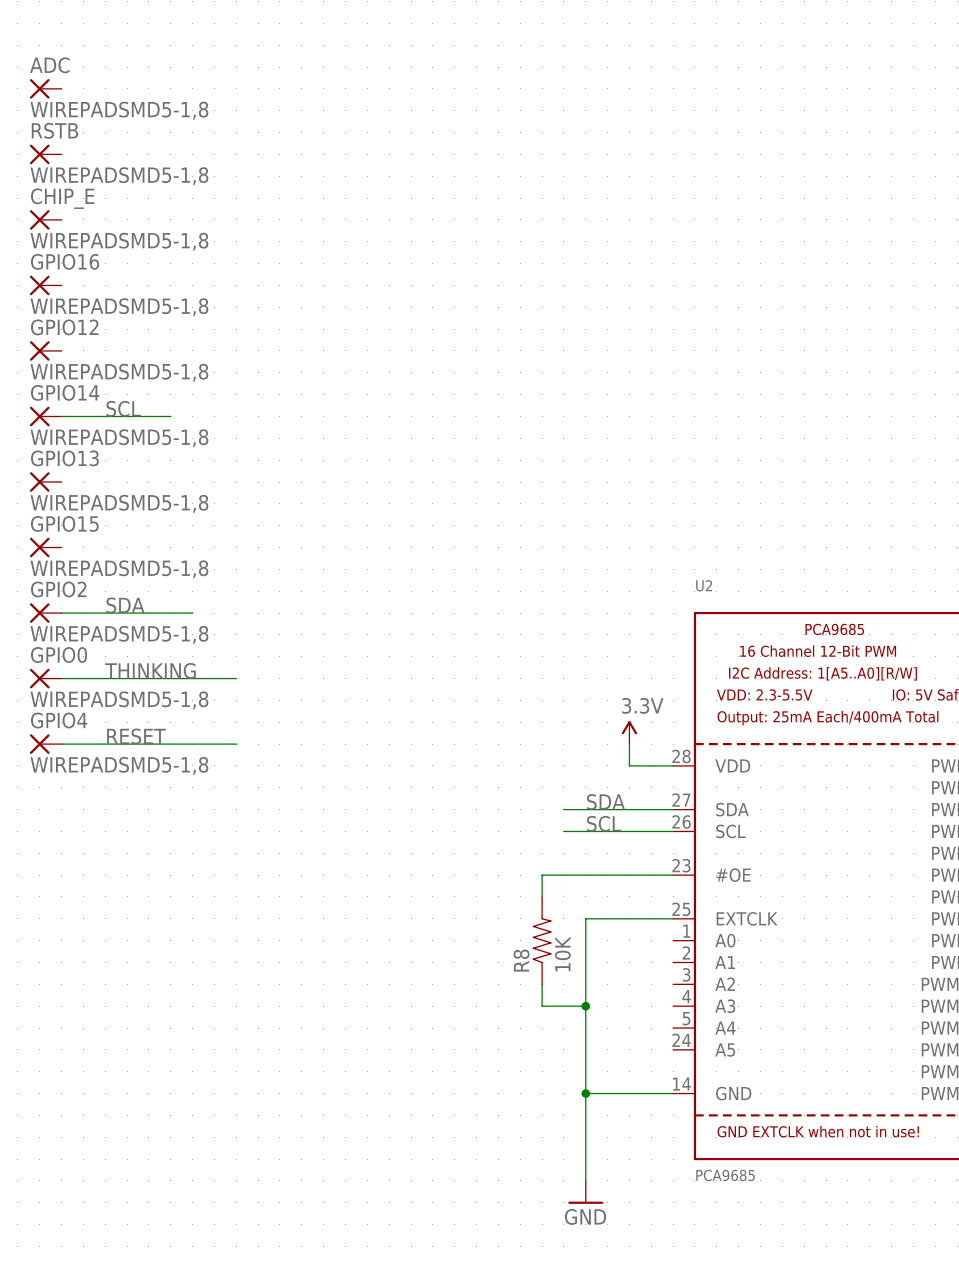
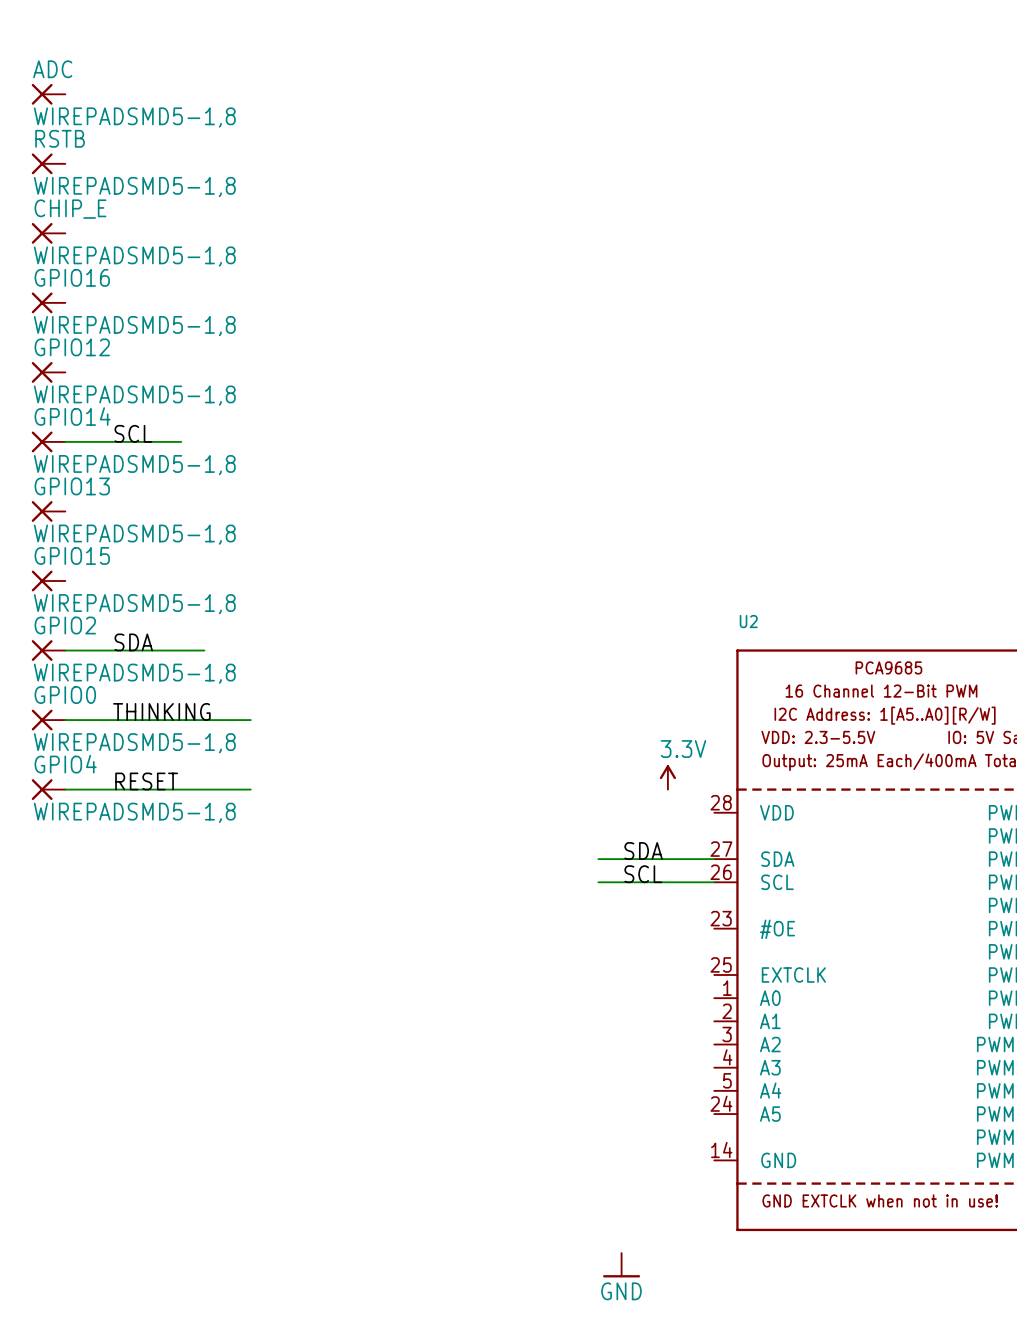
wire: (629, 744) (629, 765) (673, 765) -> none
wire: (673, 875) (542, 875) (542, 896) -> none
wire: (673, 918) (585, 918) (585, 1180) -> none
R8: 10K (542, 940) -> none
wire: (542, 984) (542, 1006) (585, 1006) -> none
junction: (585, 1006) -> none
wire: (585, 1093) (673, 1093) -> none
junction: (585, 1093) -> none
U2 value: PCA9685 (725, 1175) -> none

